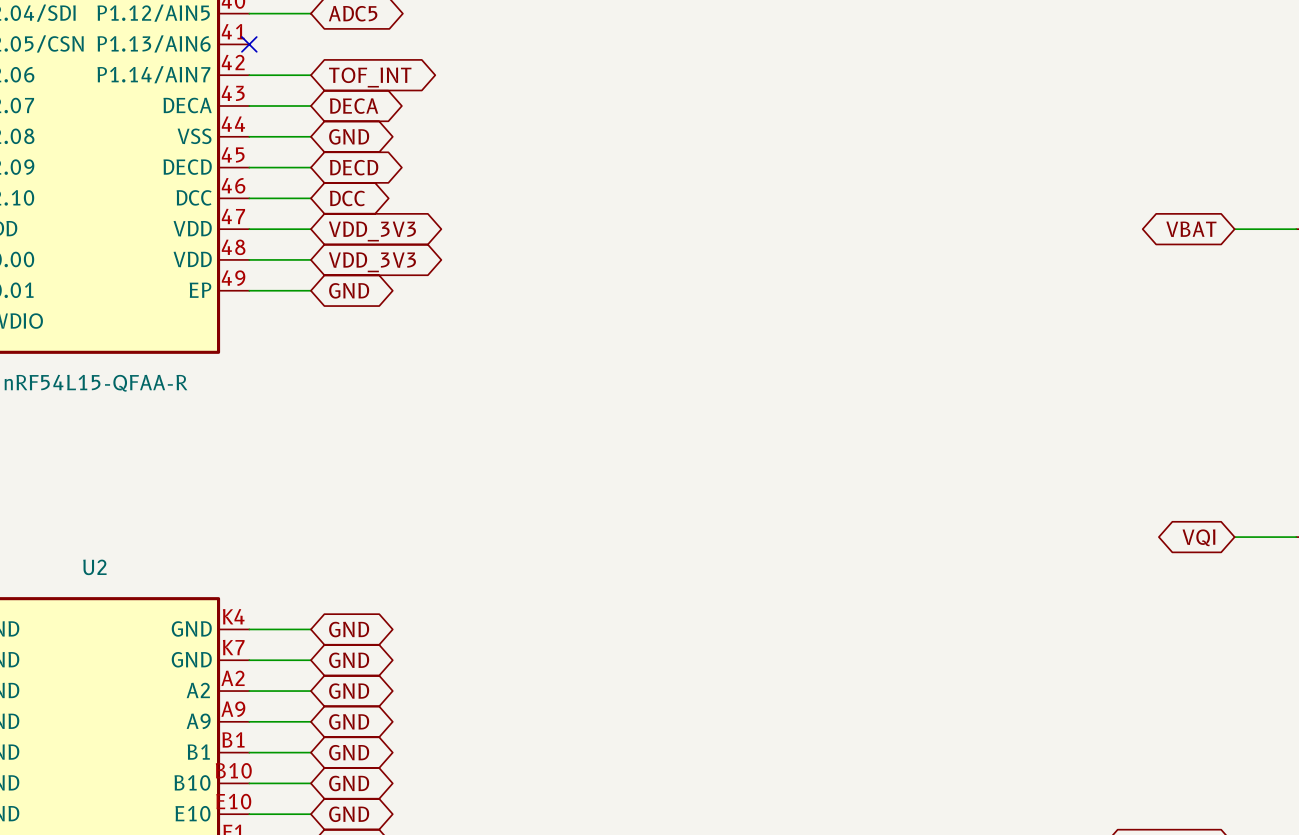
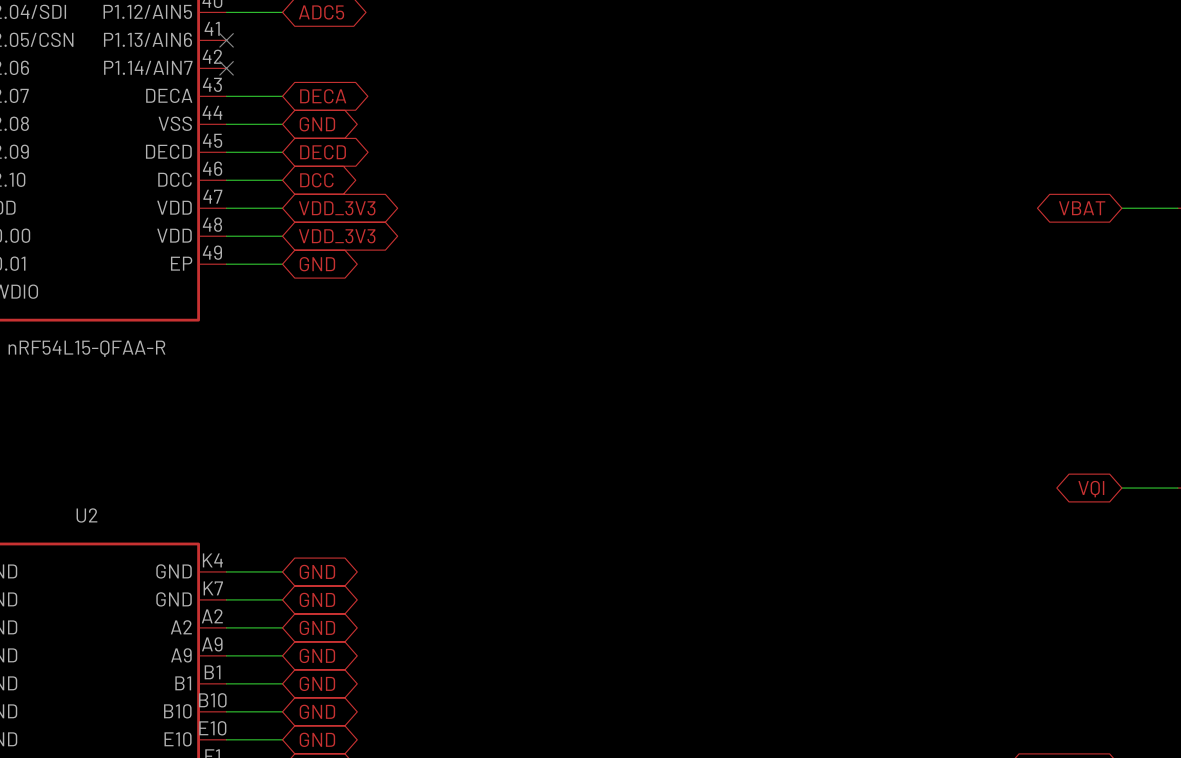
wire: (249, 75) (310, 75) -> none
no-connect mark: none -> (226, 68)
global label: TOF_INT (370, 77) -> none

